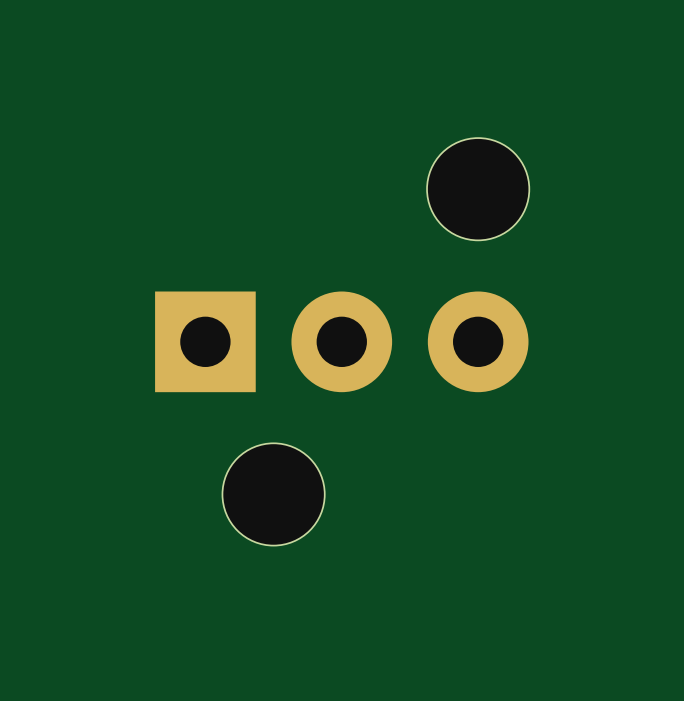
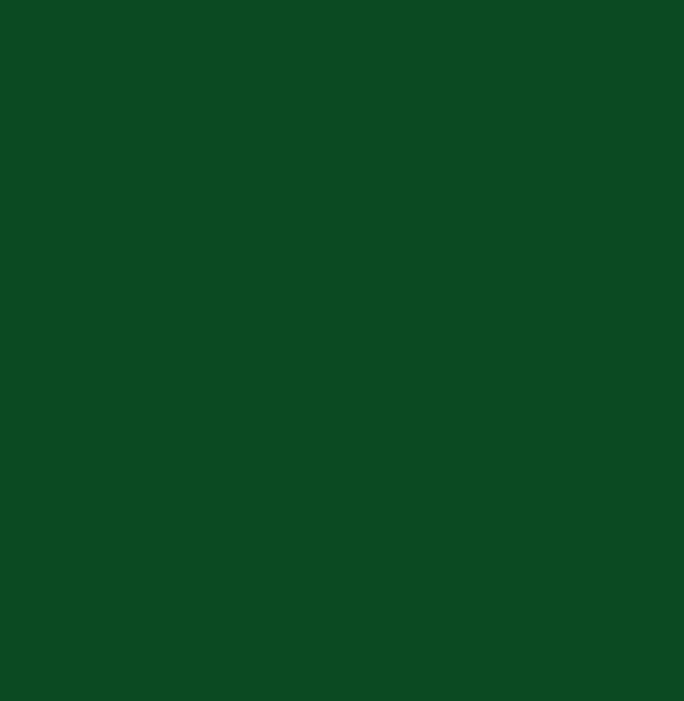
part: (342, 341) -> none

